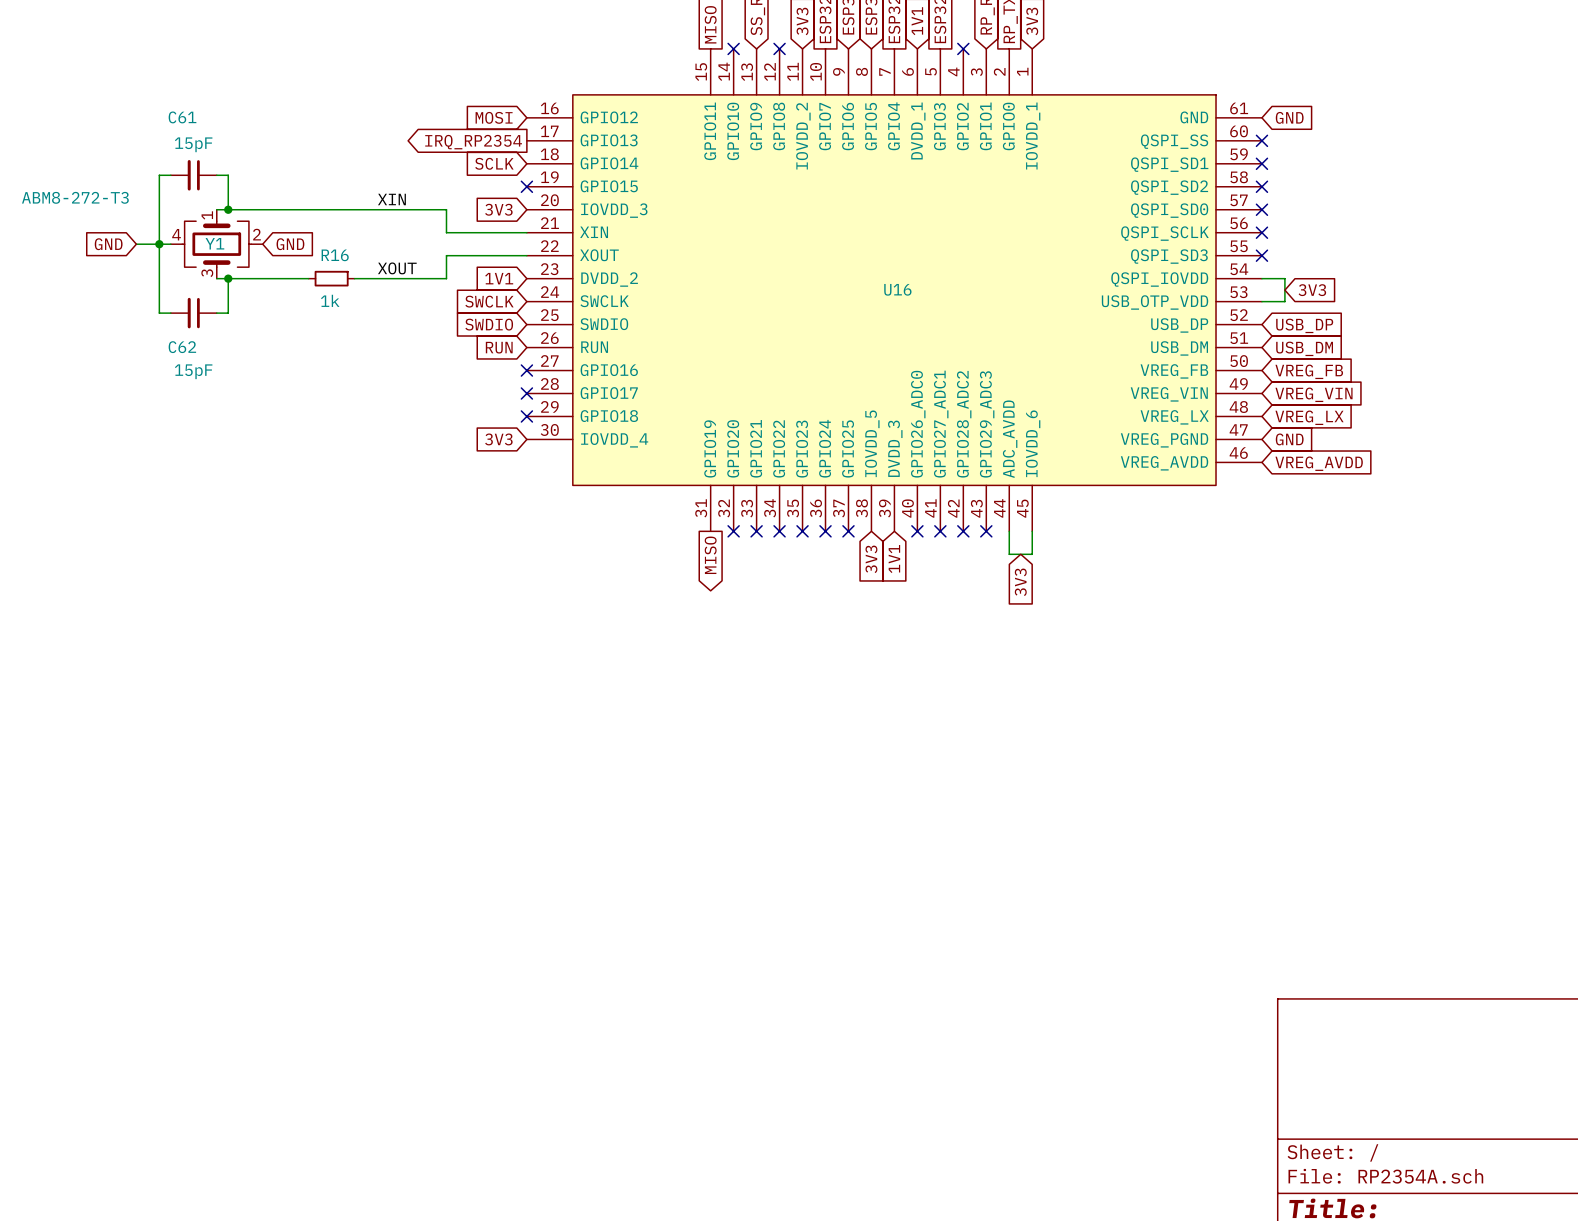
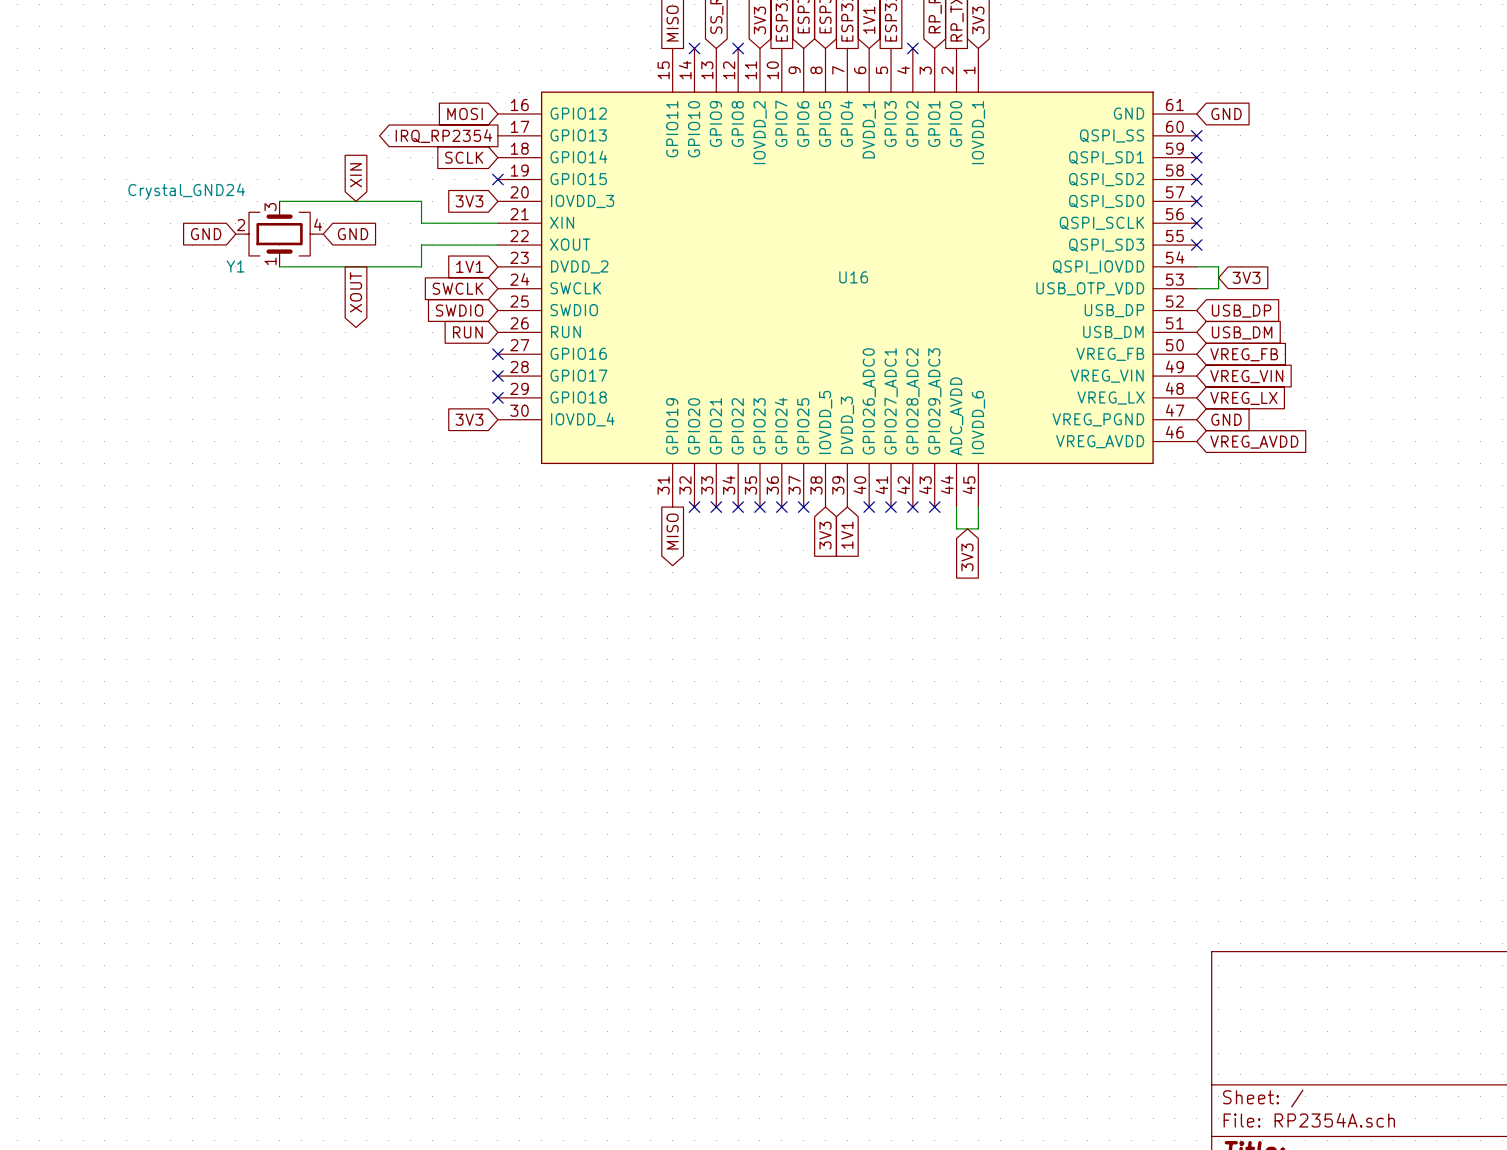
wire: (170, 175) (159, 175) (159, 313) (170, 313) -> none
C61: 15pF (193, 175) -> none
wire: (216, 175) (228, 175) (228, 209) -> none
global label: none -> XIN (356, 175)
Y1 value: ABM8-272-T3 (75, 197) -> Crystal_GND24 (186, 191)
label: XIN (391, 199) -> none
wire: (216, 209) (297, 209) -> none
junction: (228, 209) -> none
Y1 name position: Y1 (214, 243) -> Y1 (235, 266)
global label: GND (108, 244) -> none
wire: (136, 244) (170, 244) -> none
junction: (159, 244) -> none
Y1 rotation: 0° (216, 244) -> 180° (279, 234)
Y1 position: (216, 244) -> (279, 234)
global label rotation: 0° (290, 244) -> 180° (206, 234)
global label position: GND (290, 244) -> GND (206, 234)
global label: none -> GND (353, 234)
label: XOUT (397, 268) -> none
wire: (216, 278) (297, 278) -> none
wire: (228, 278) (228, 313) (216, 313) -> none
junction: (228, 278) -> none
wire: none -> (290, 266) (334, 266)
R16: 1k (331, 278) -> none
global label: none -> XOUT (356, 292)
C62: 15pF (193, 313) -> none

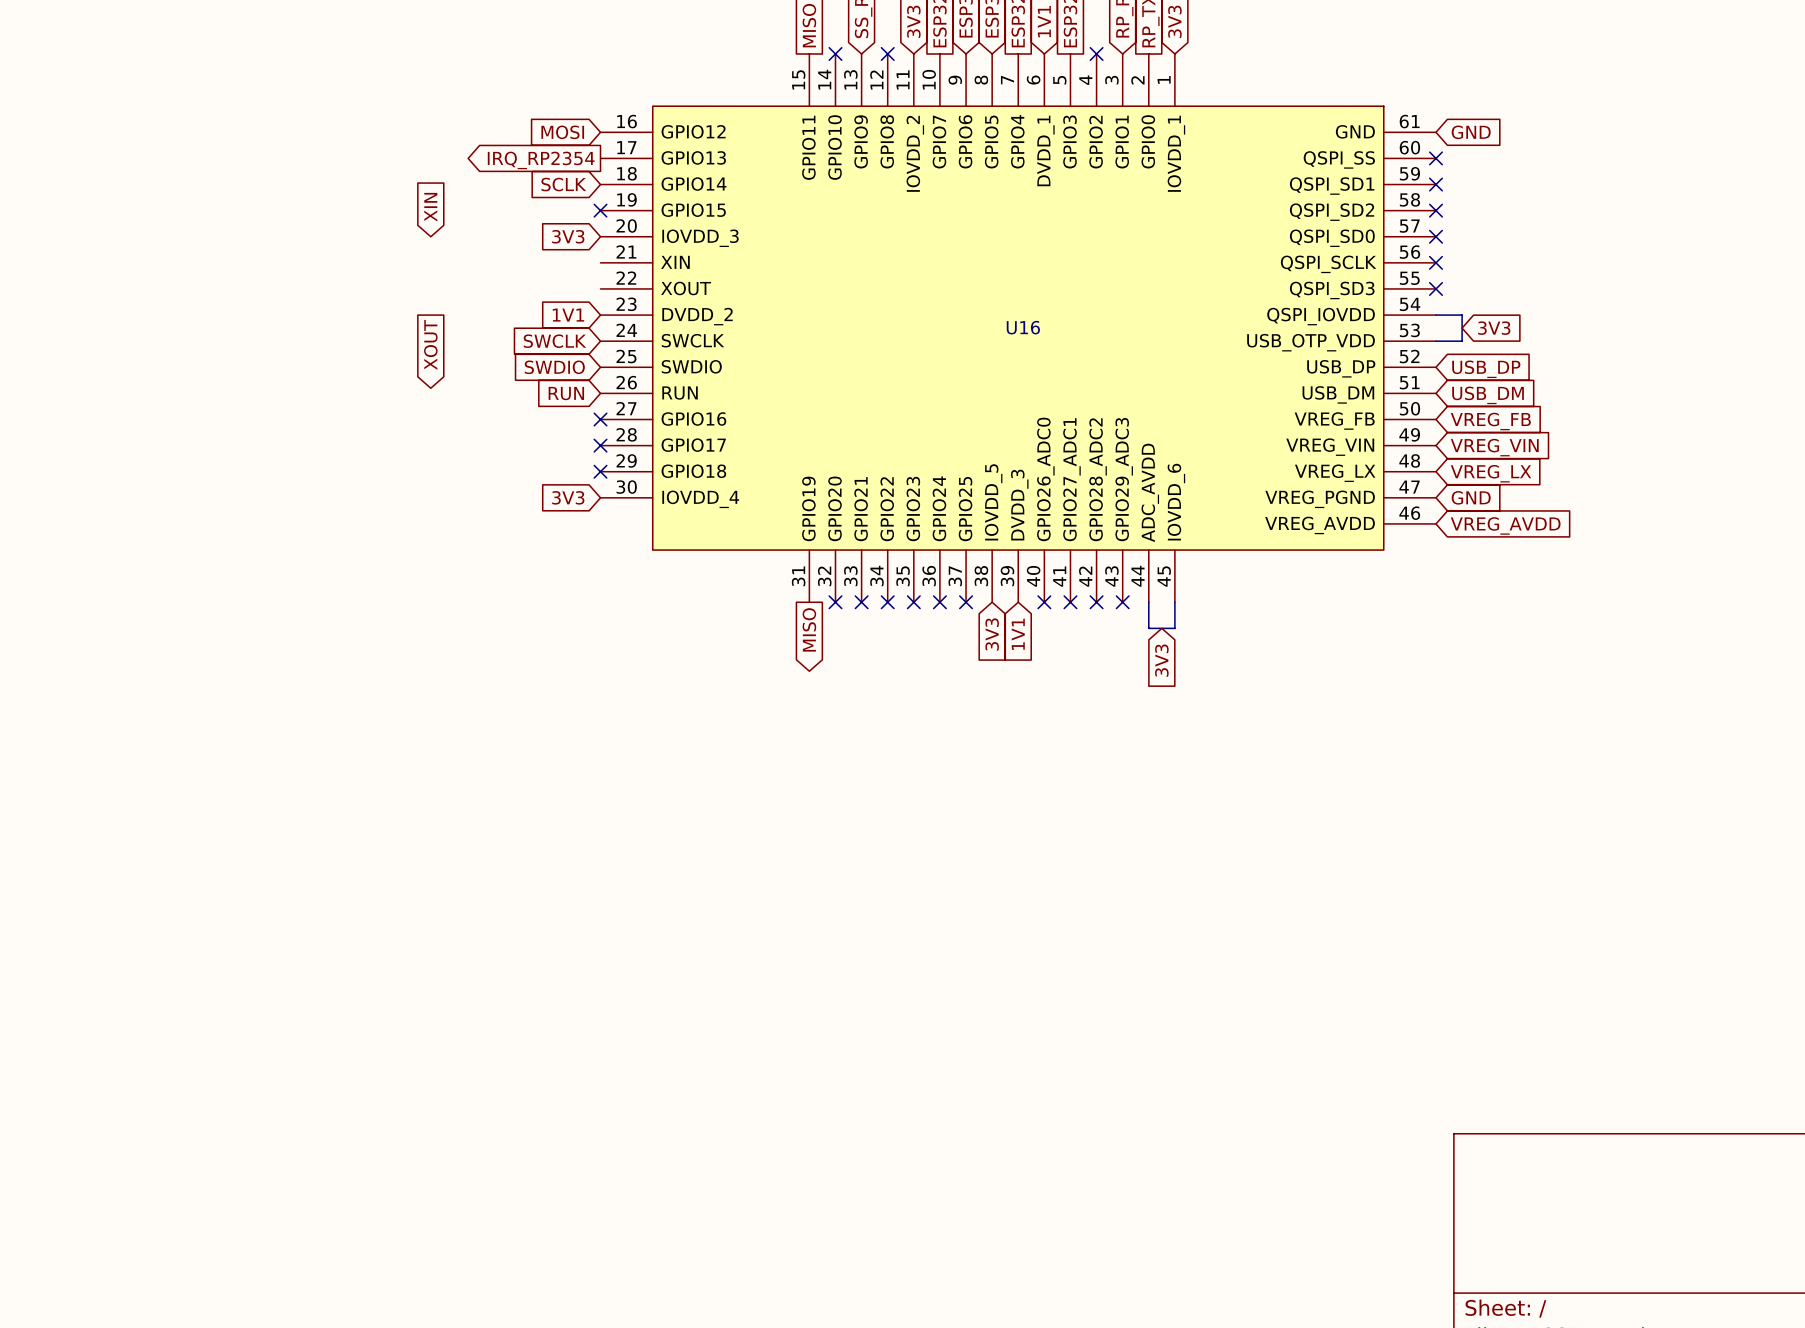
wire: (279, 201) (421, 201) (421, 223) (497, 223) -> none
global label: GND (206, 234) -> none
Y1: Crystal_GND24 (279, 234) -> none
global label: GND (353, 234) -> none
wire: (497, 245) (421, 245) (421, 266) (279, 266) -> none

